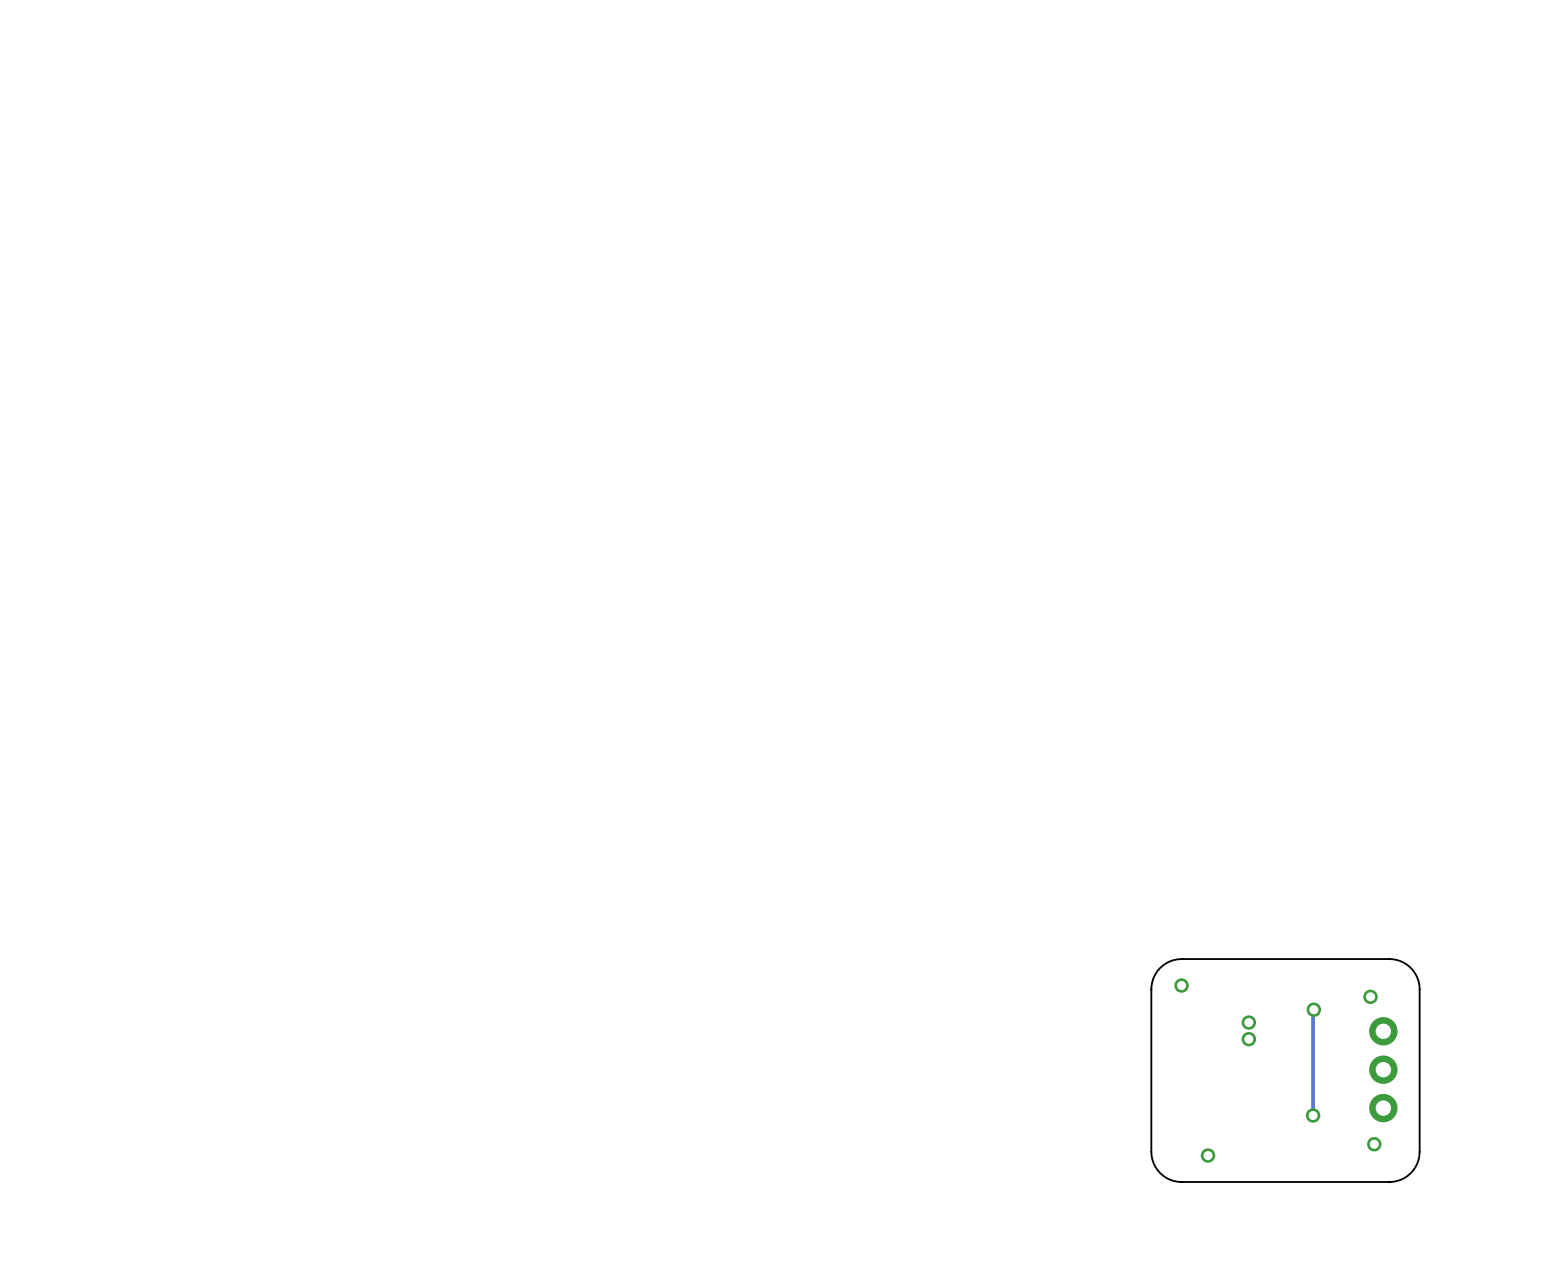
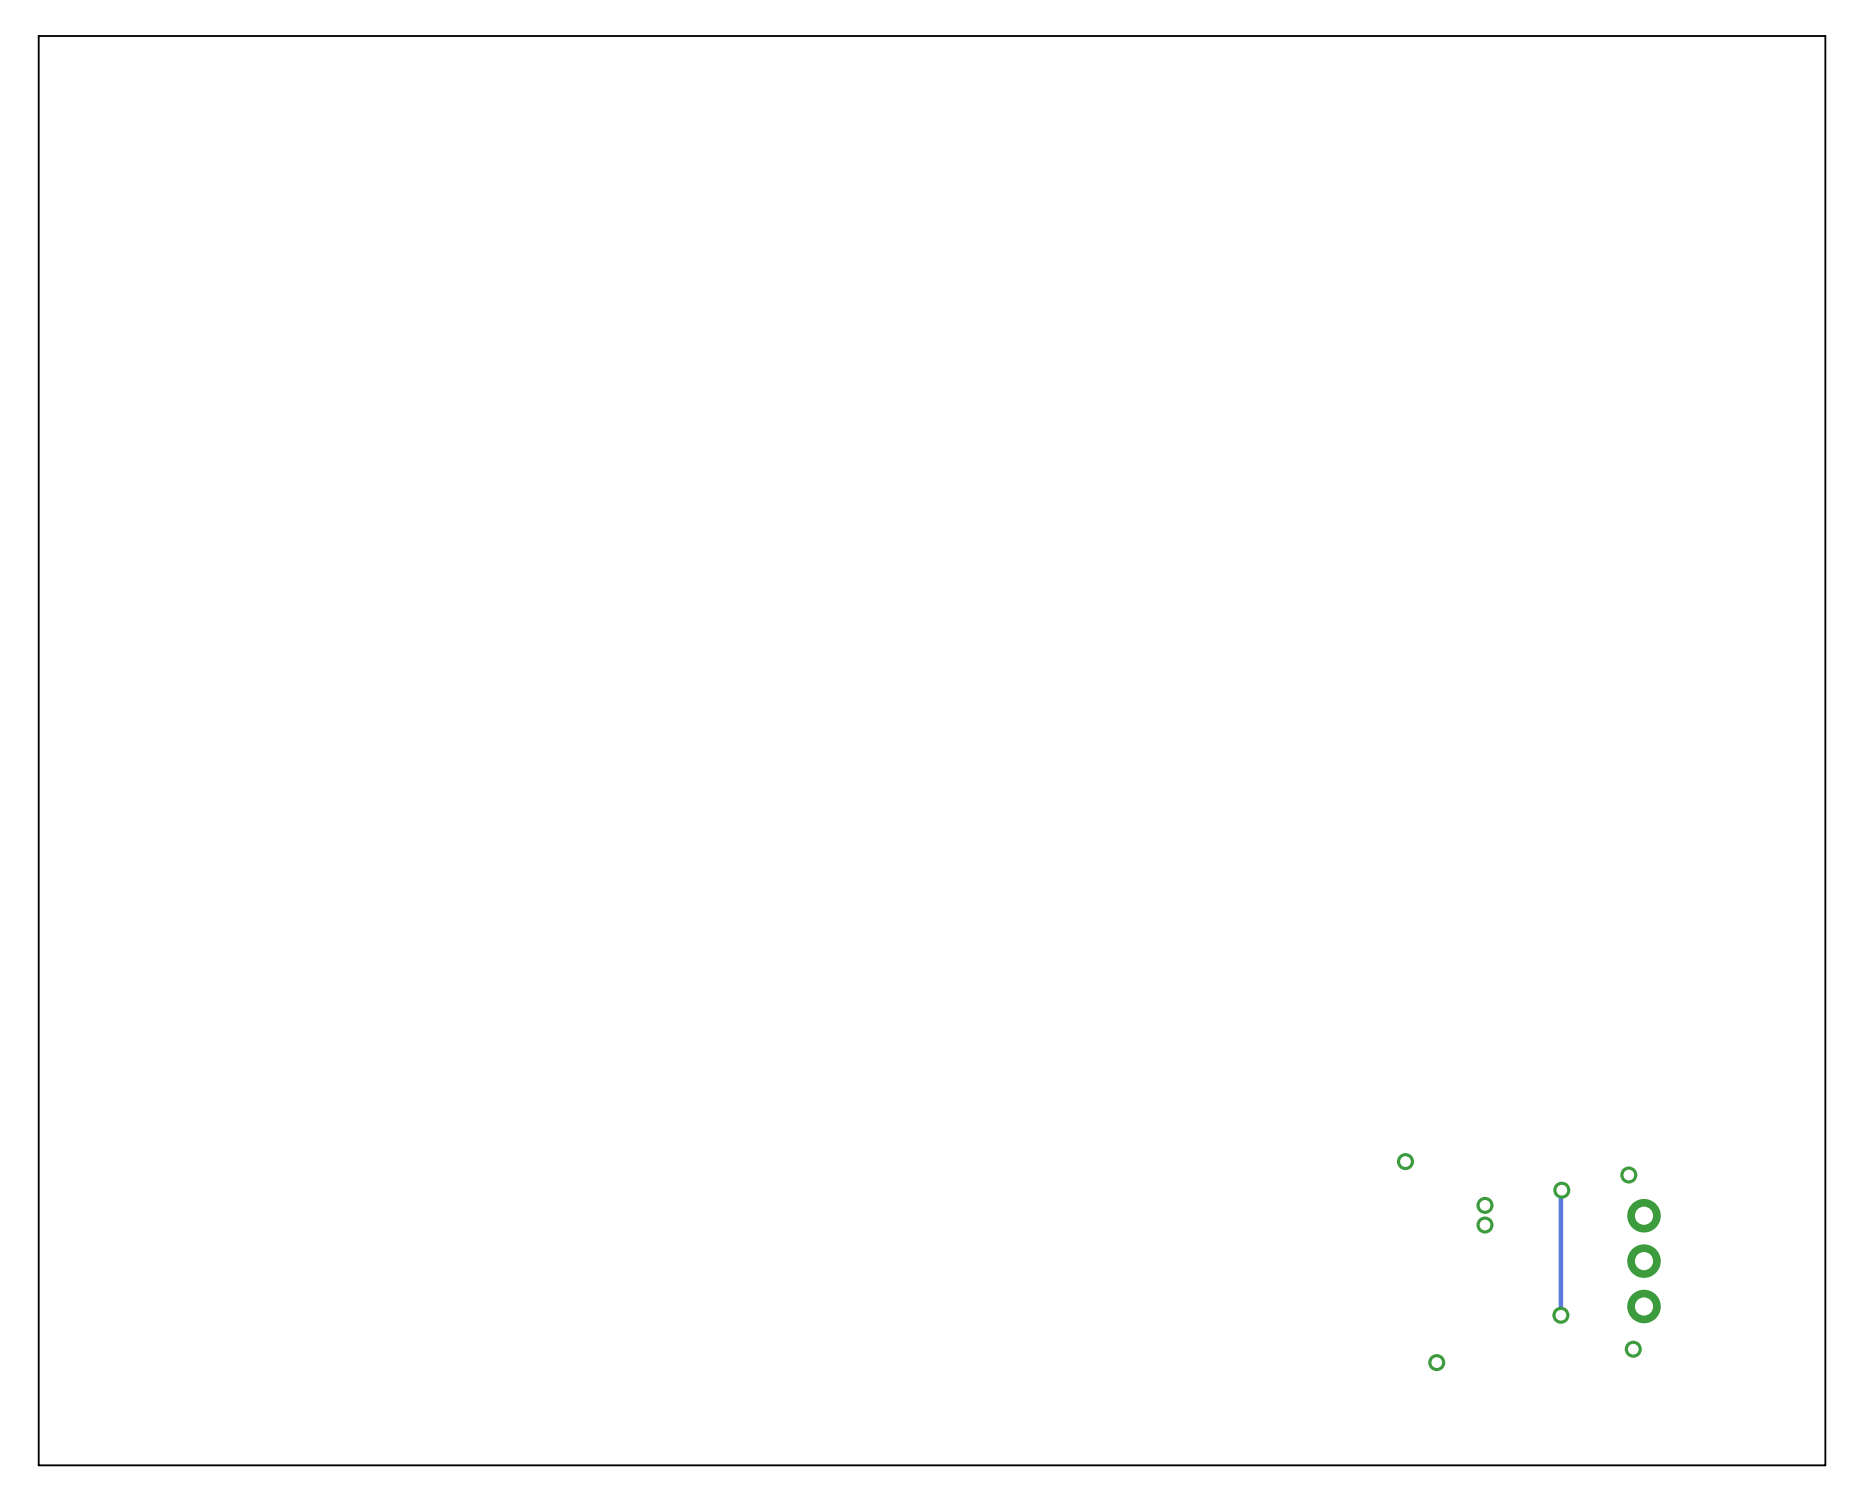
board edge: none -> (1825, 36) (38, 36) (38, 1465) (1825, 1465) (1825, 36)
board edge: (1389, 959) (1181, 959) (1170, 961) (1160, 967) (1153, 977) (1151, 989) (1151, 1151) (1153, 1163) (1160, 1173) (1170, 1179) (1181, 1182) (1389, 1182) (1400, 1179) (1410, 1173) (1417, 1163) (1419, 1151) (1419, 985) (1415, 974) (1407, 965) (1400, 961) (1389, 959) -> none

